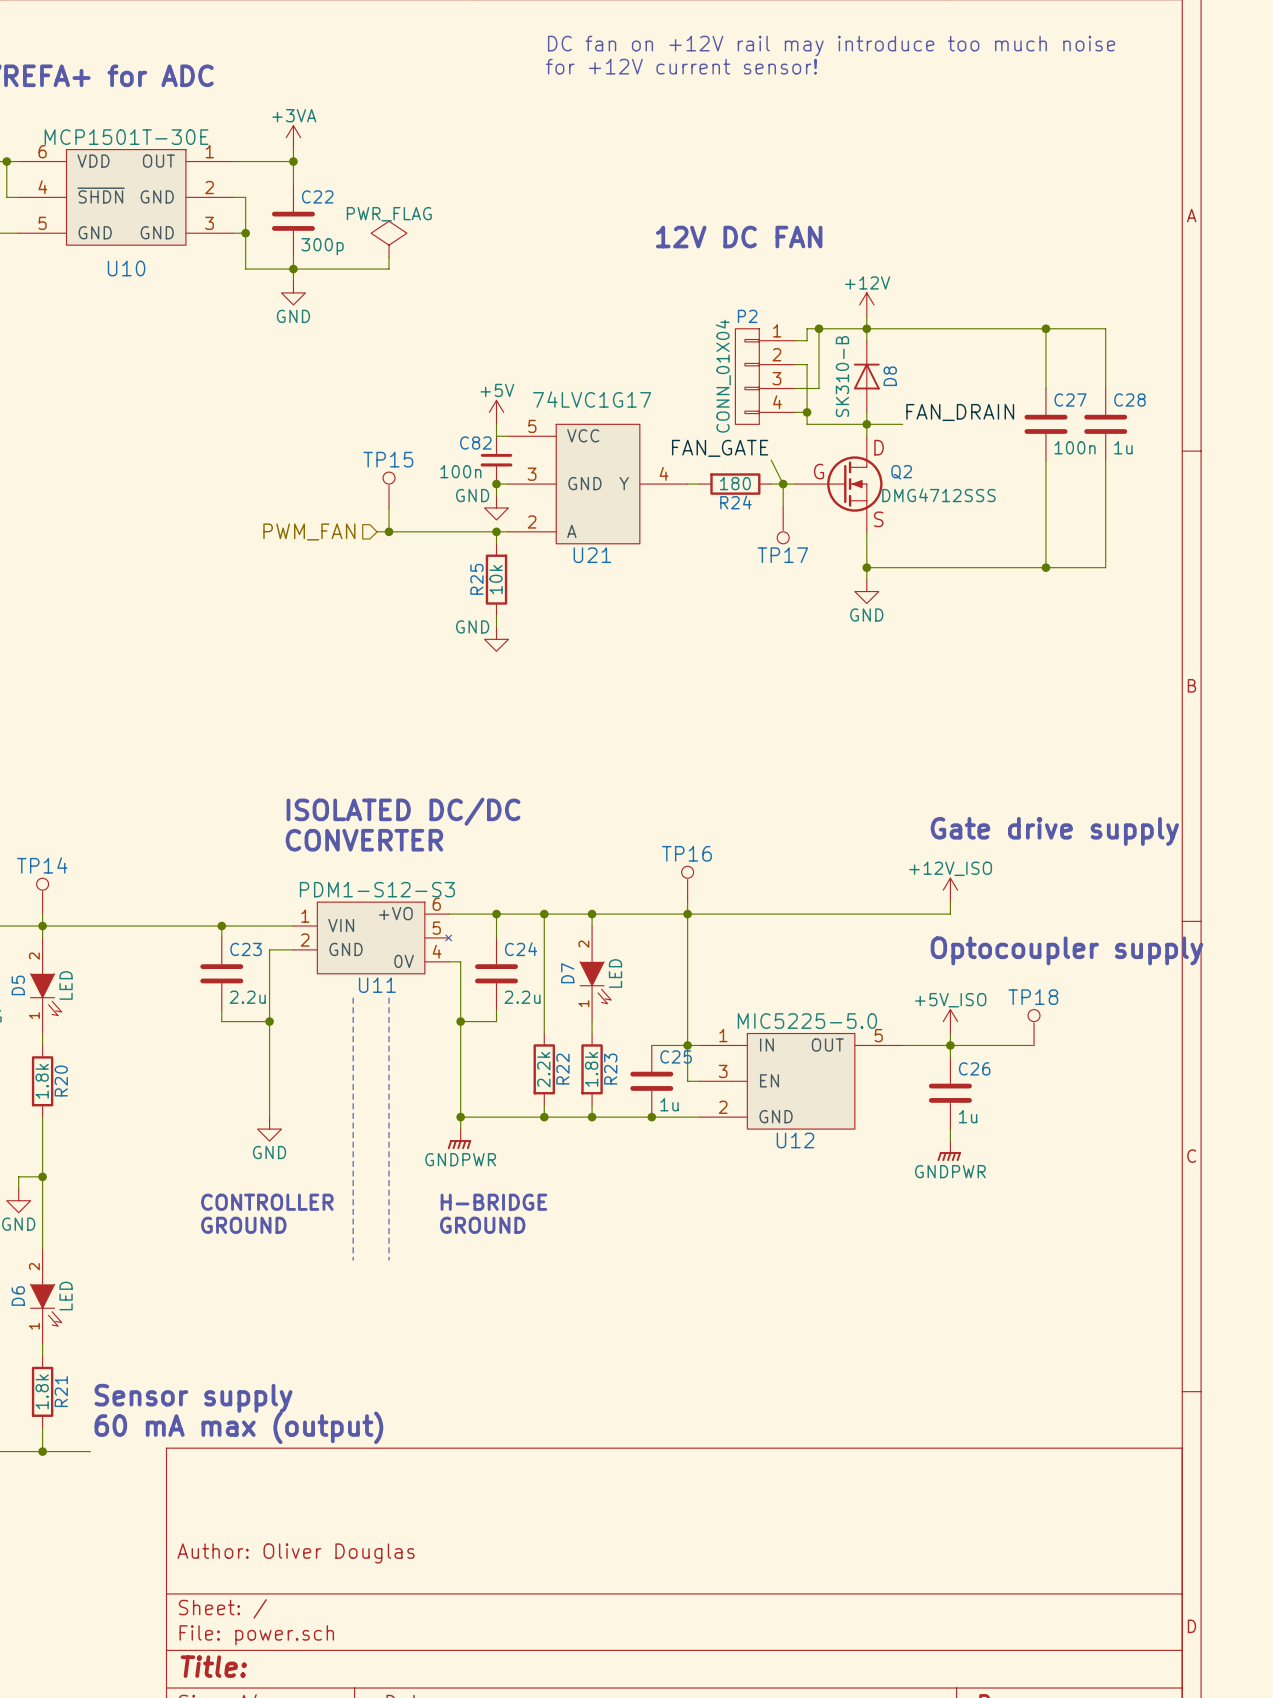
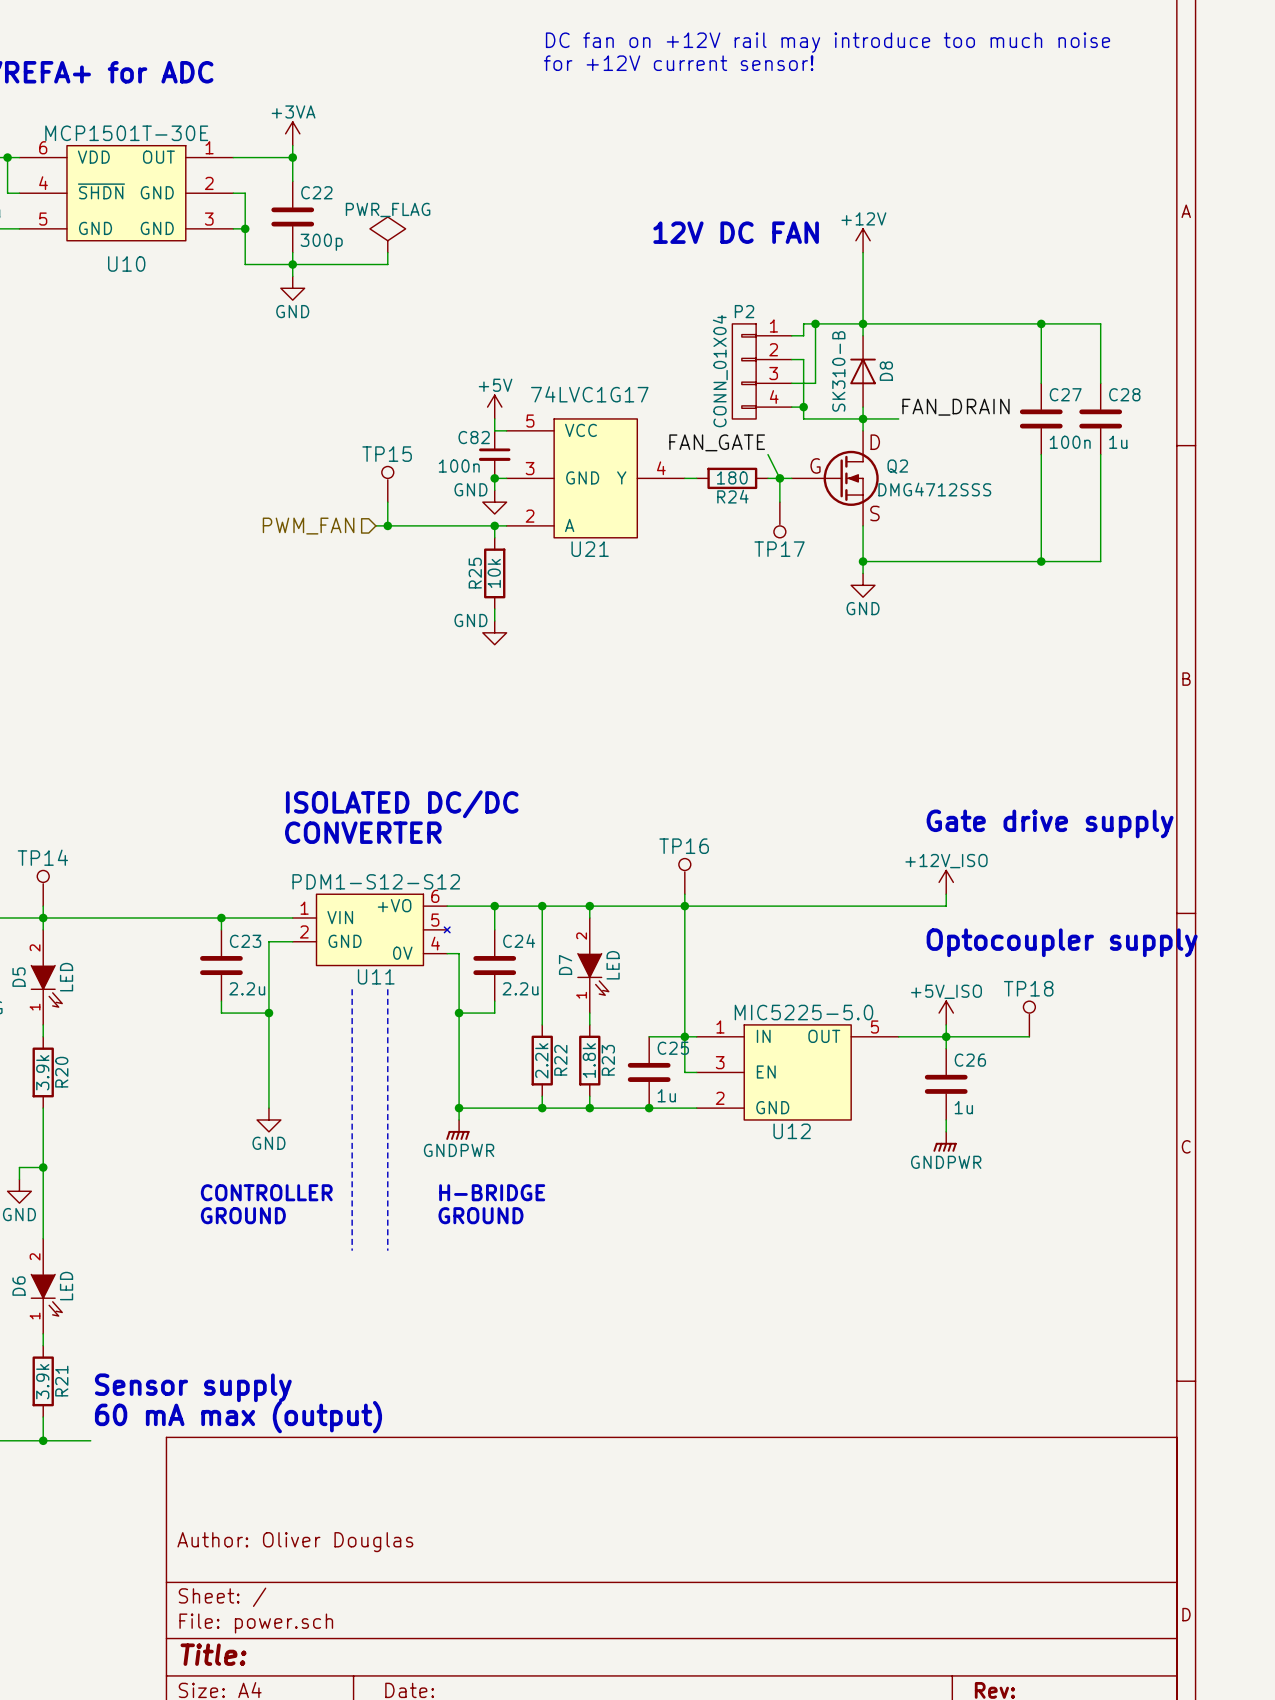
wire: none -> (863, 252) (863, 312)
power symbol position: +12V (866, 304) -> +12V (863, 240)
U11 value: PDM1-S12-S3 (377, 889) -> PDM1-S12-S12 (376, 881)
R20 value: 1.8k (42, 1081) -> 3.9k (42, 1072)
R21 value: 1.8k (42, 1391) -> 3.9k (42, 1381)

